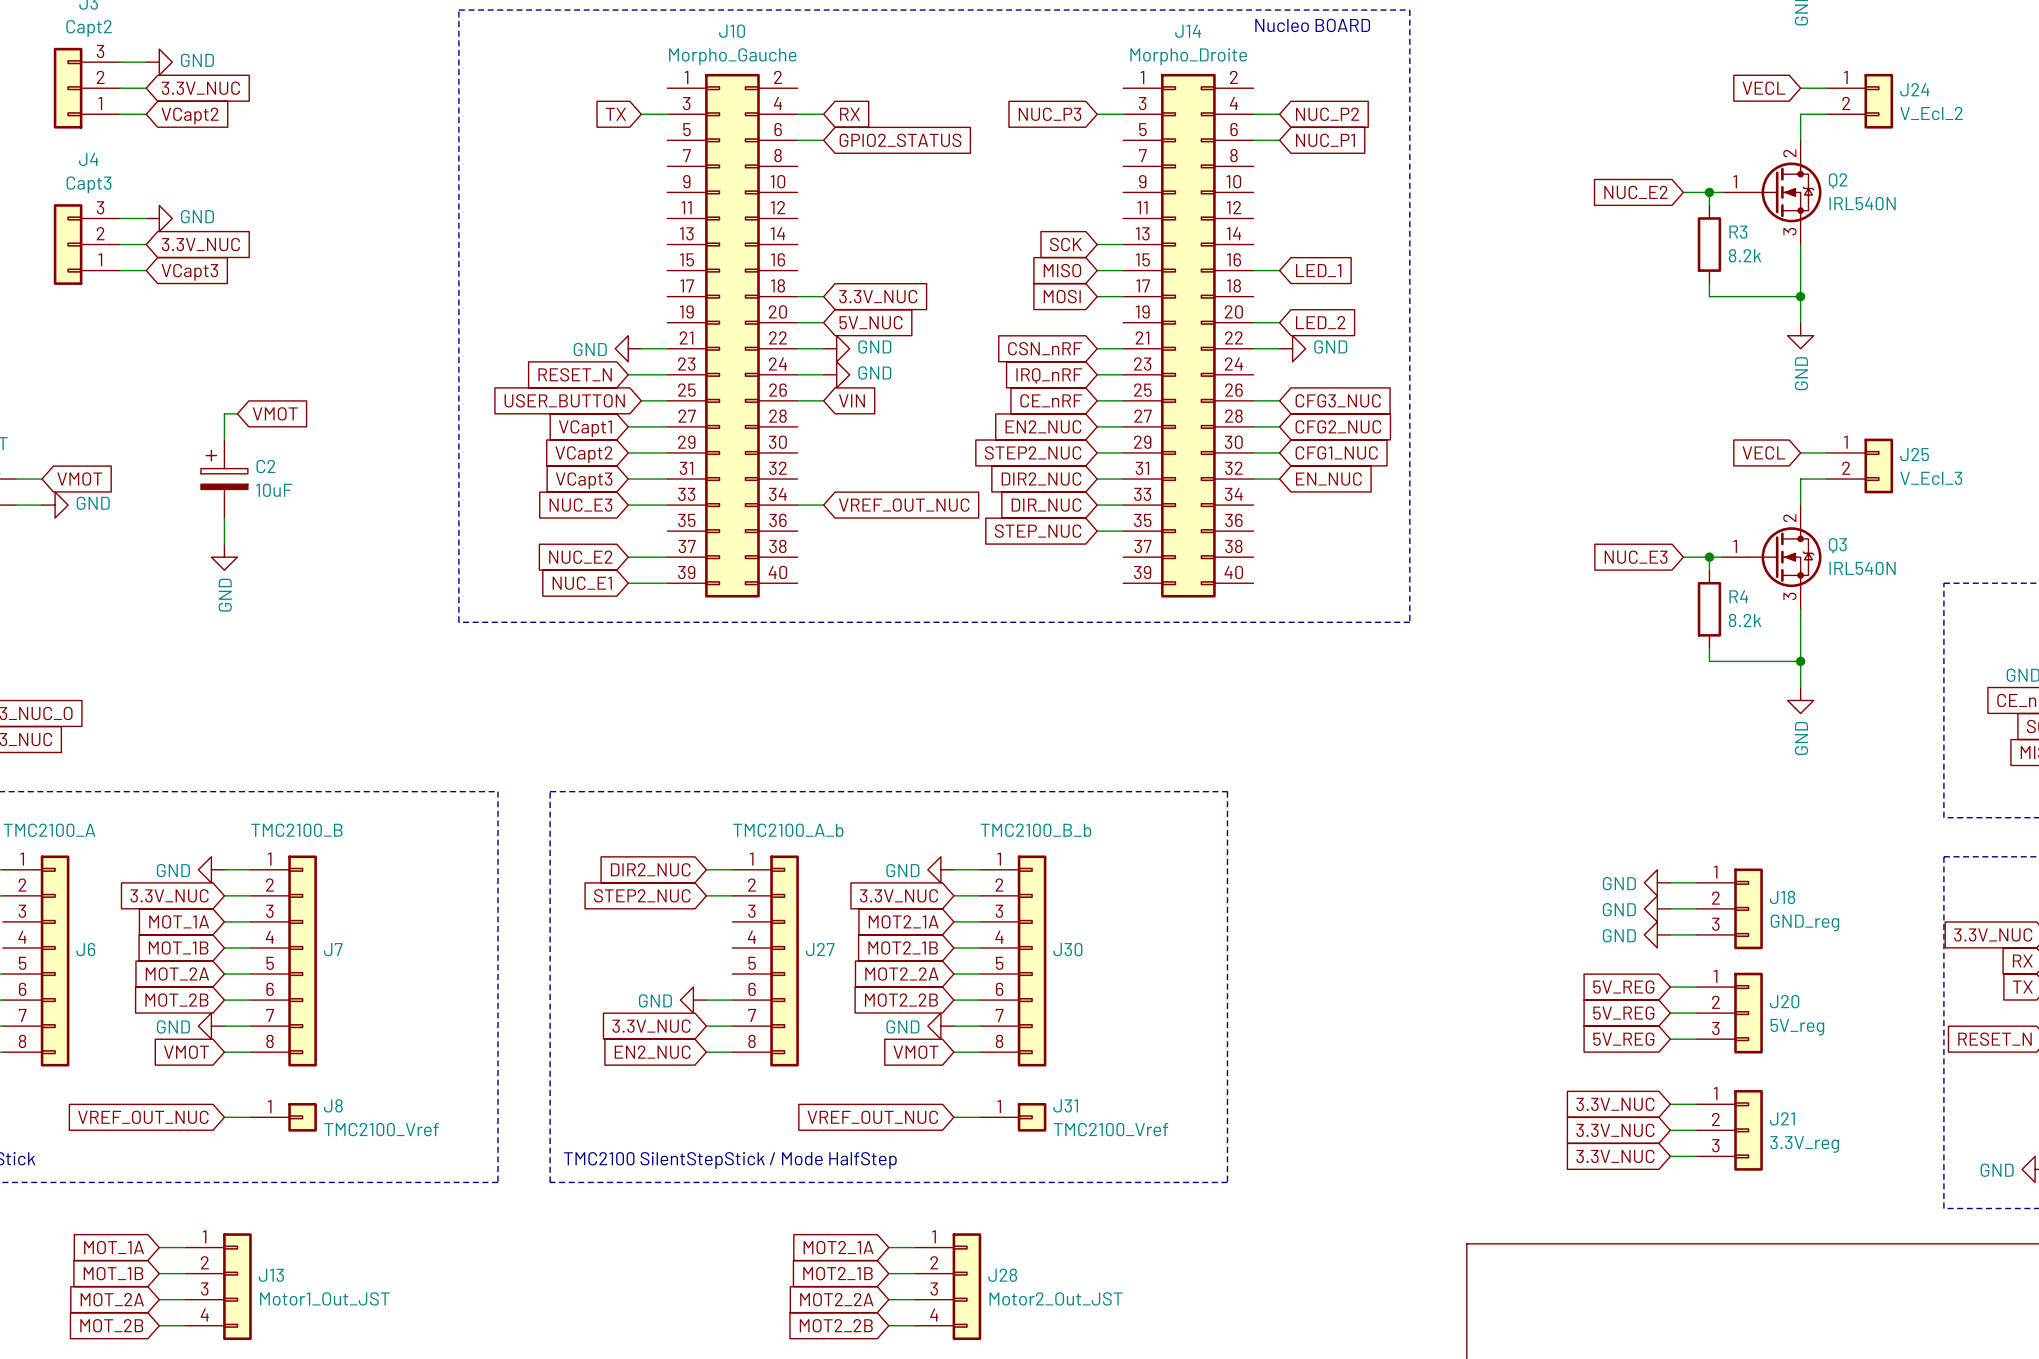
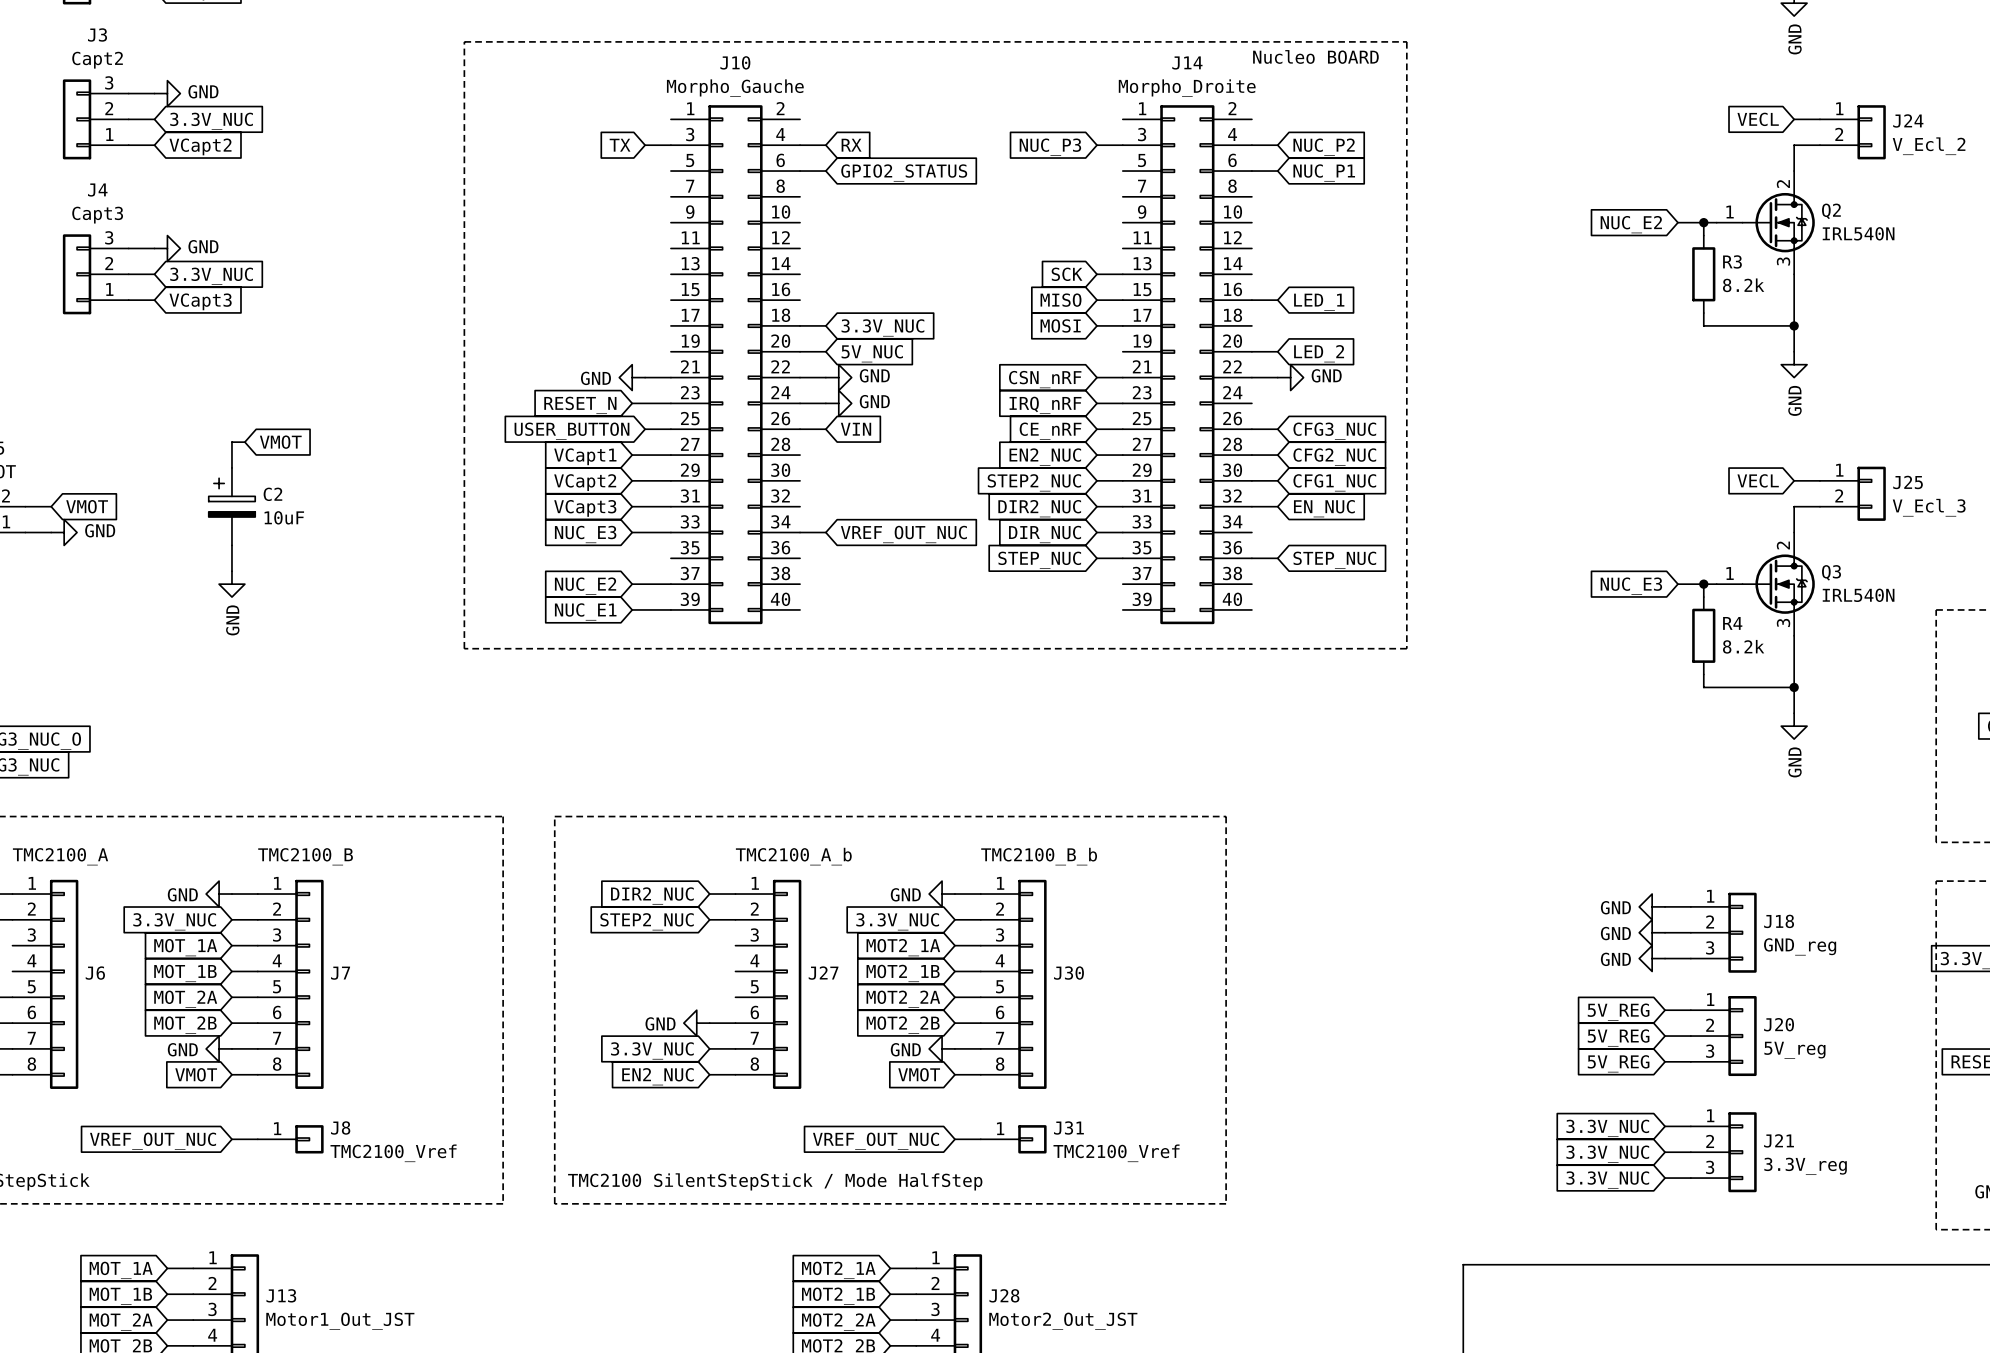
wire: none -> (1251, 558) (1277, 558)
global label: none -> STEP_NUC (1334, 560)

